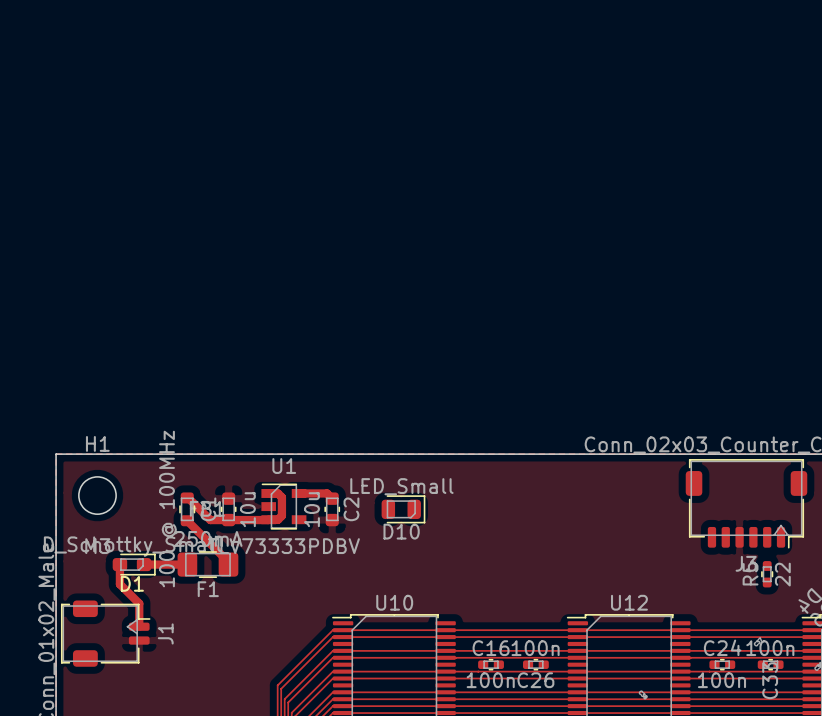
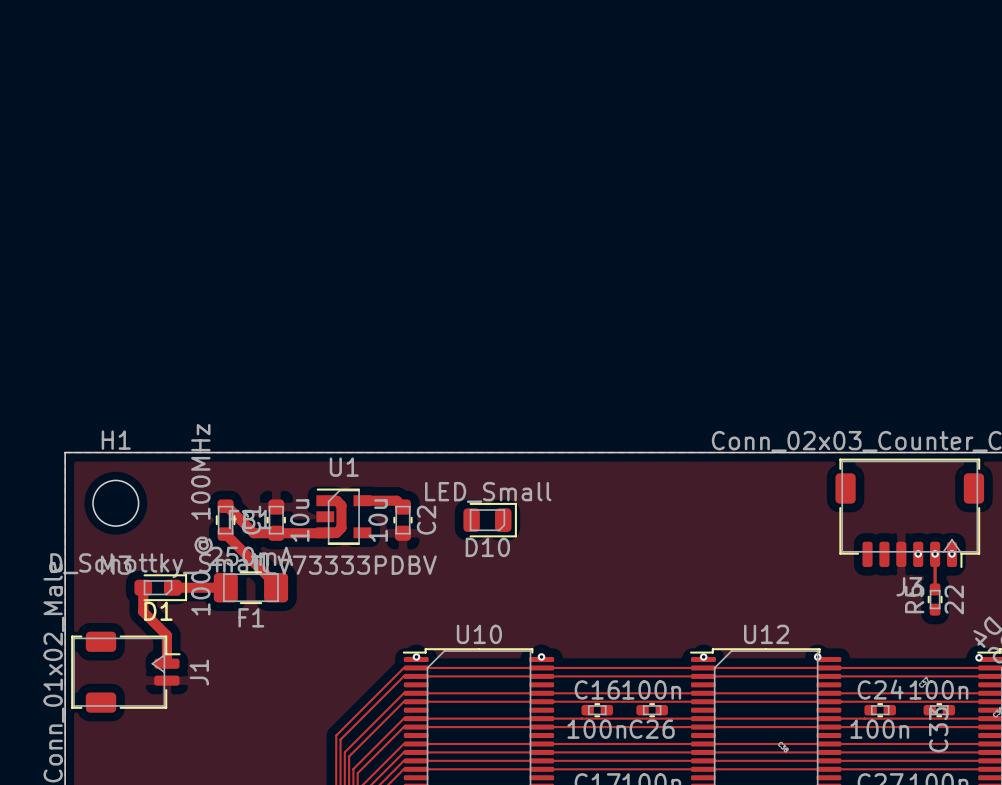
via: none -> (918, 553)
via: none -> (935, 553)
via: none -> (951, 553)
track: none -> (935, 554) (935, 589)
via: none -> (416, 656)
via: none -> (541, 656)
via: none -> (703, 656)
via: none -> (817, 656)
via: none -> (979, 657)

